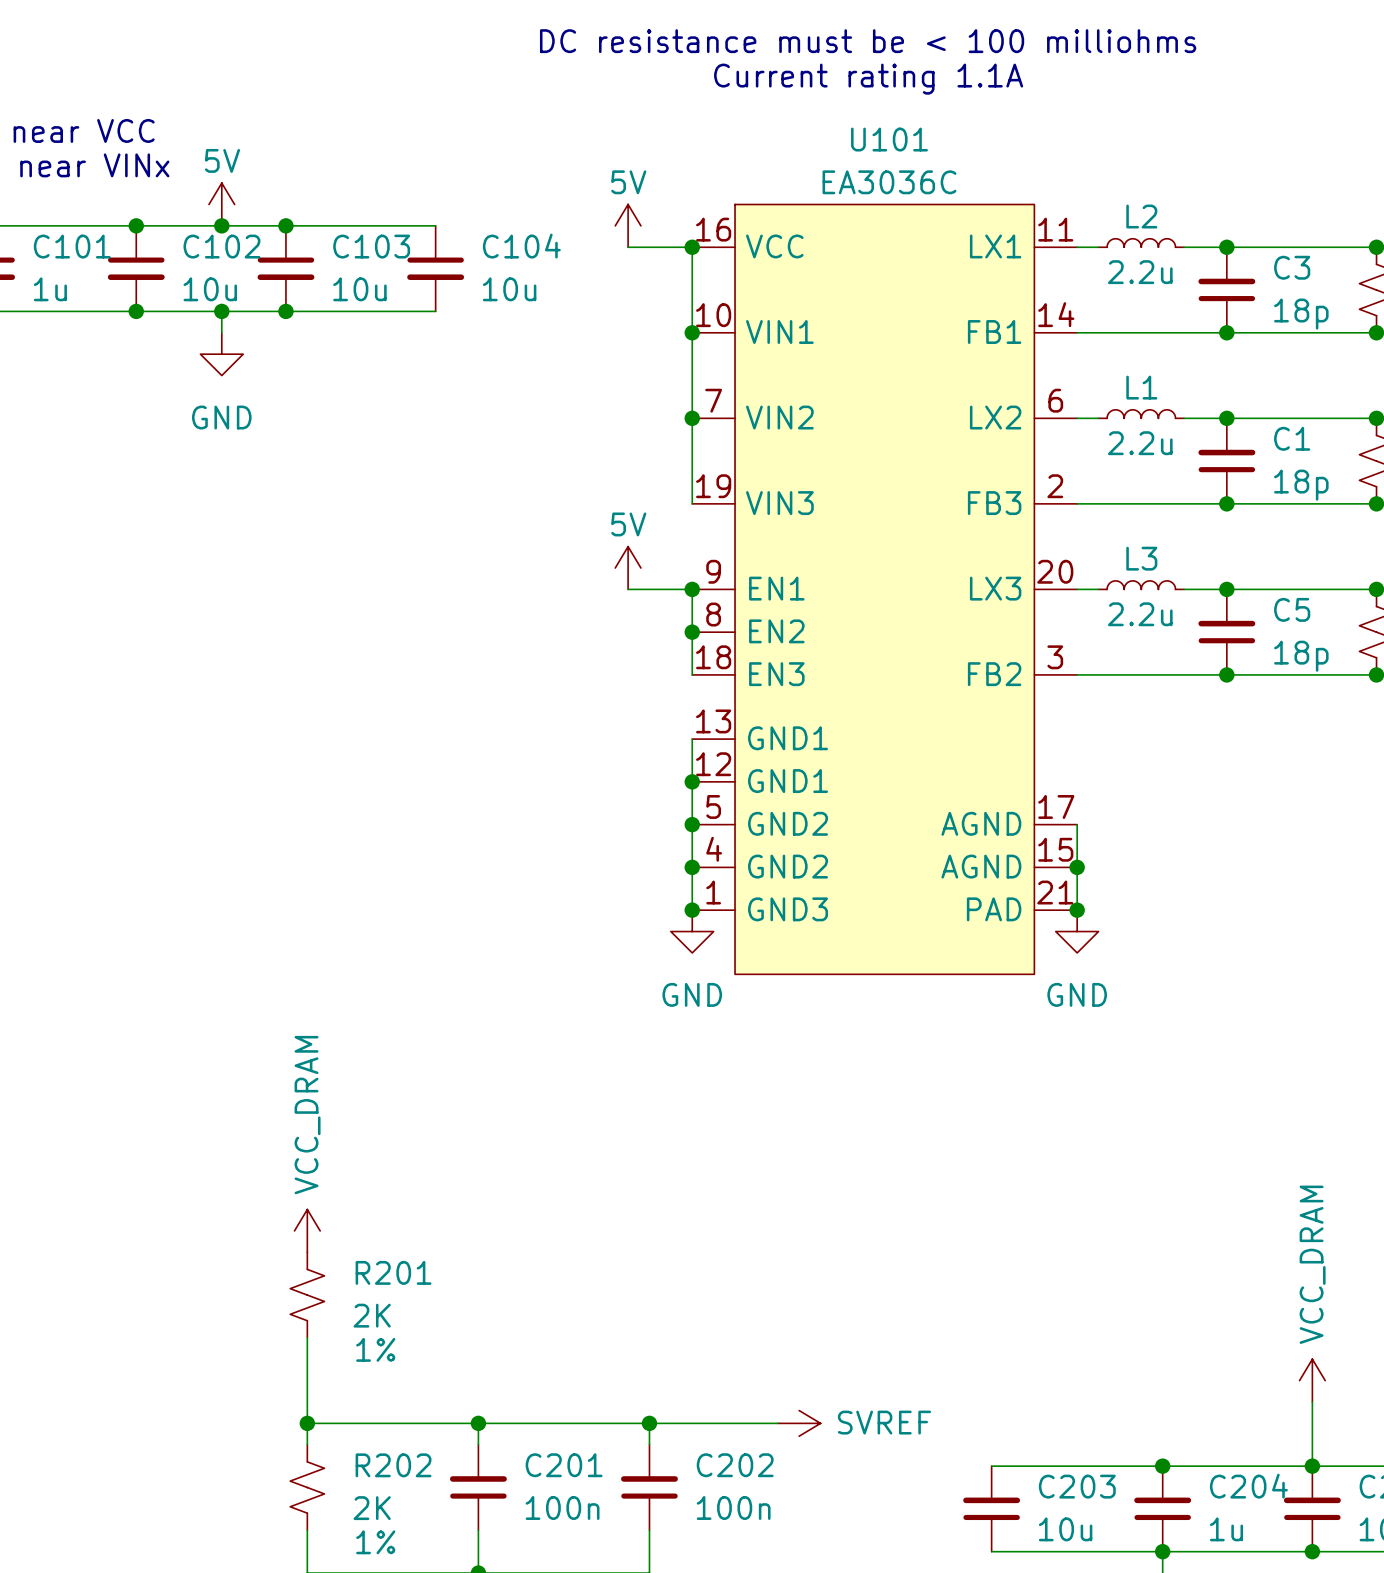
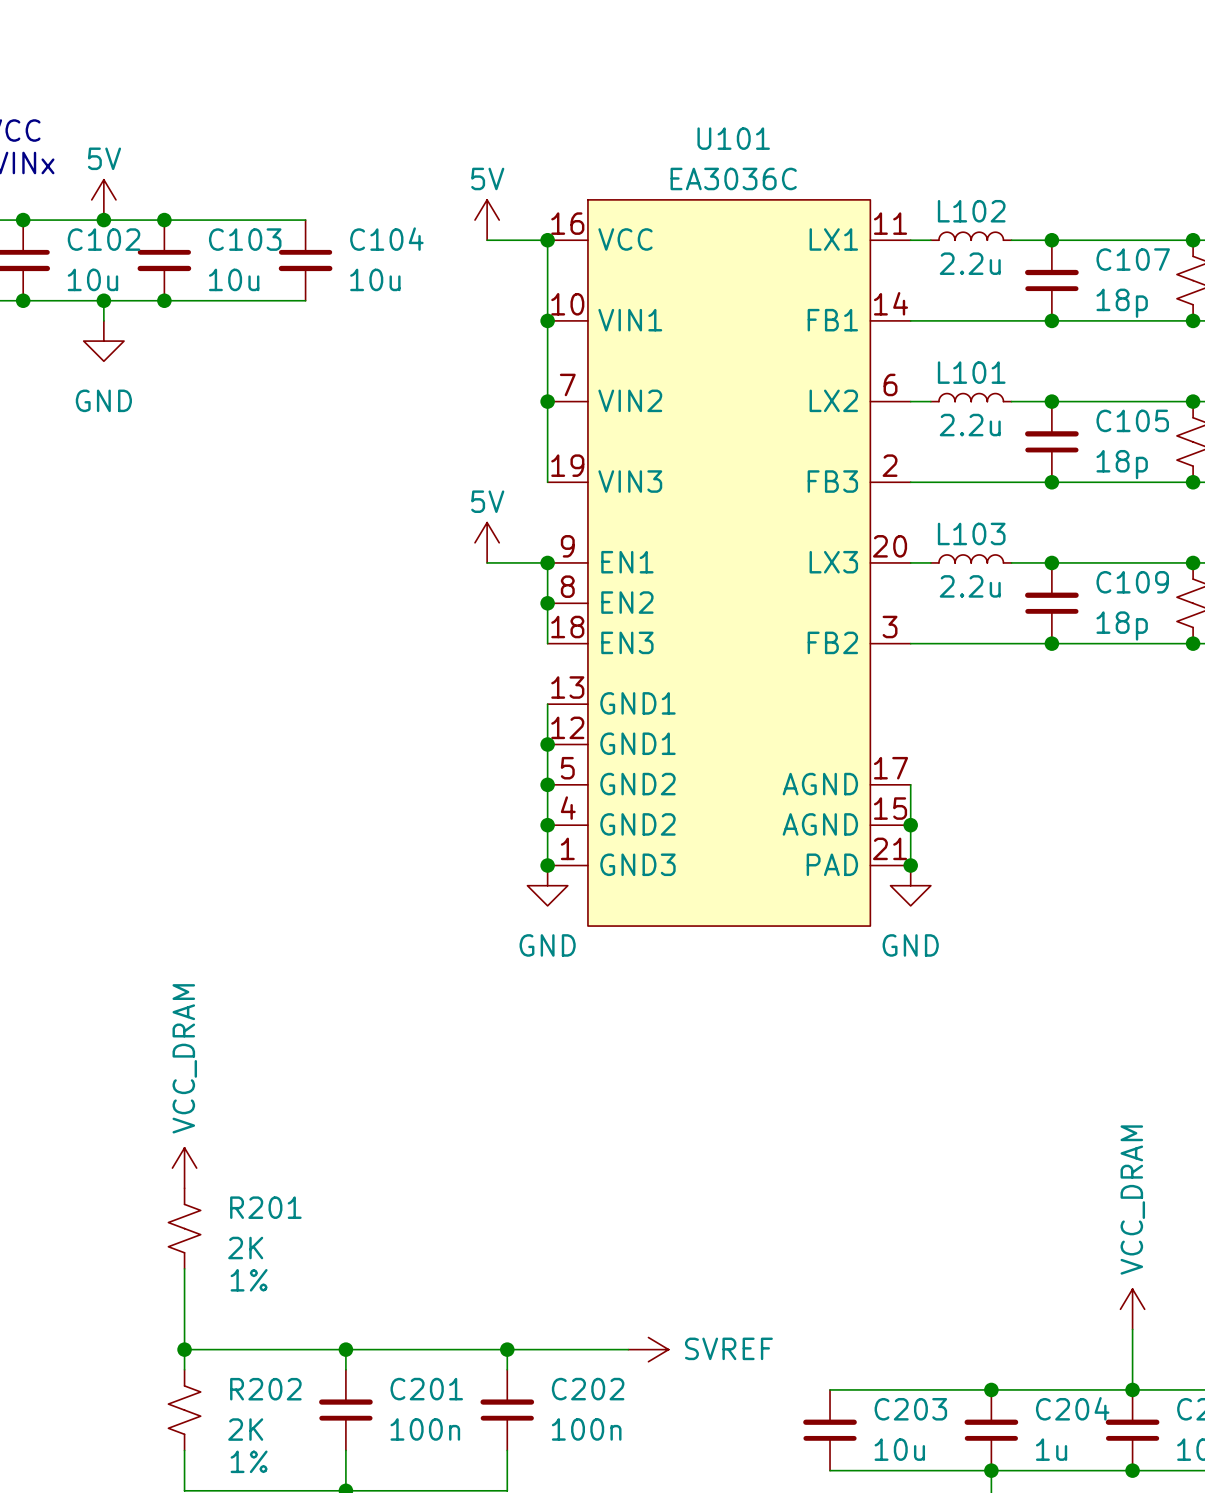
text: DC resistance must be < 100 milliohms (868, 41) -> none
text: Current rating 1.1A (868, 79) -> none
L2 name: L2 (1141, 216) -> L102 (971, 211)
C3 name: C3 (1292, 267) -> C107 (1133, 259)
L1 name: L1 (1141, 387) -> L101 (971, 372)
C1 name: C1 (1292, 438) -> C105 (1132, 420)
L3 name: L3 (1141, 558) -> L103 (971, 533)
C5 name: C5 (1292, 609) -> C109 (1132, 582)

